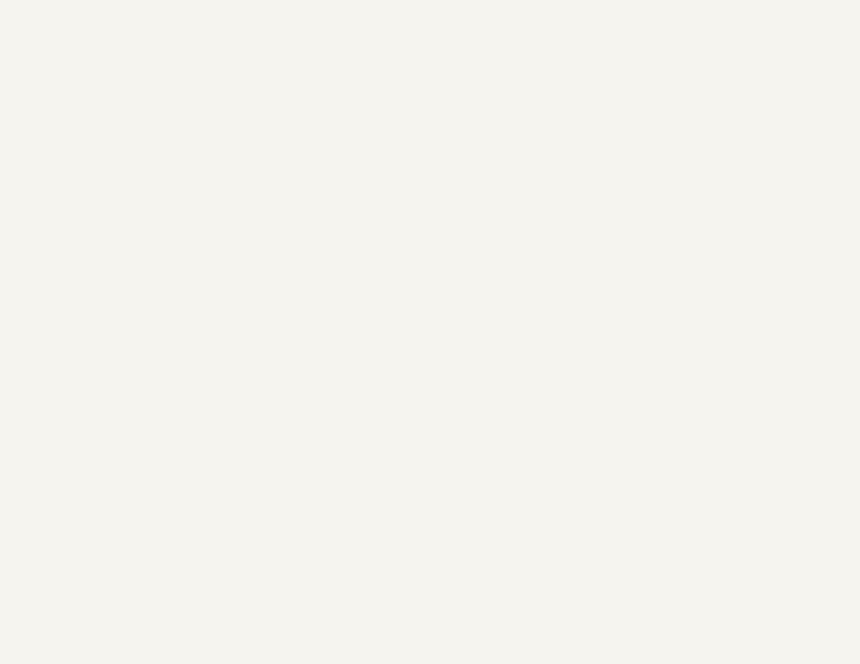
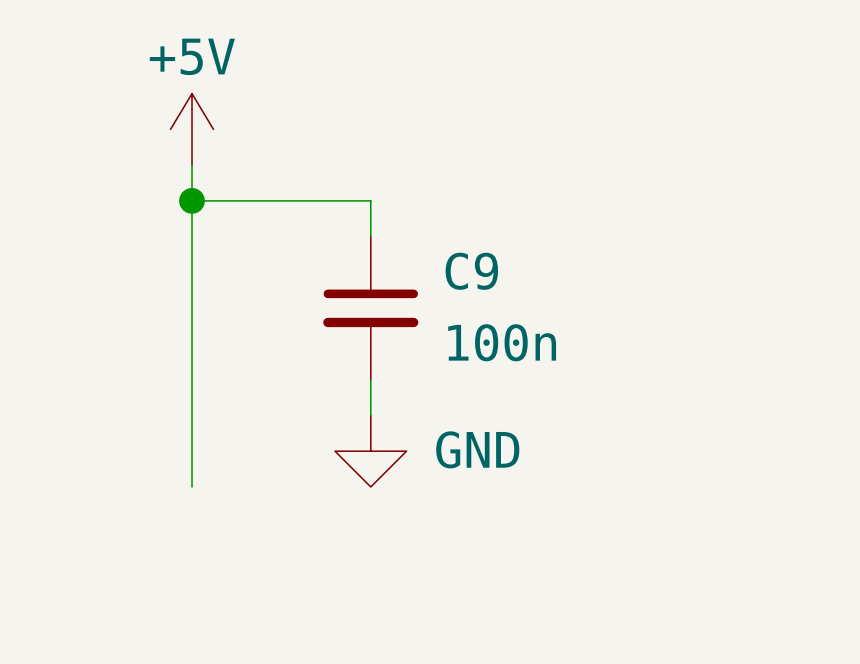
power symbol: none -> +5V (192, 129)
wire: none -> (192, 165) (192, 486)
wire: none -> (192, 200) (370, 200) (370, 236)
junction: none -> (192, 200)
C9: none -> 100n (370, 308)
wire: none -> (370, 379) (370, 415)
power symbol: none -> GND (370, 451)

